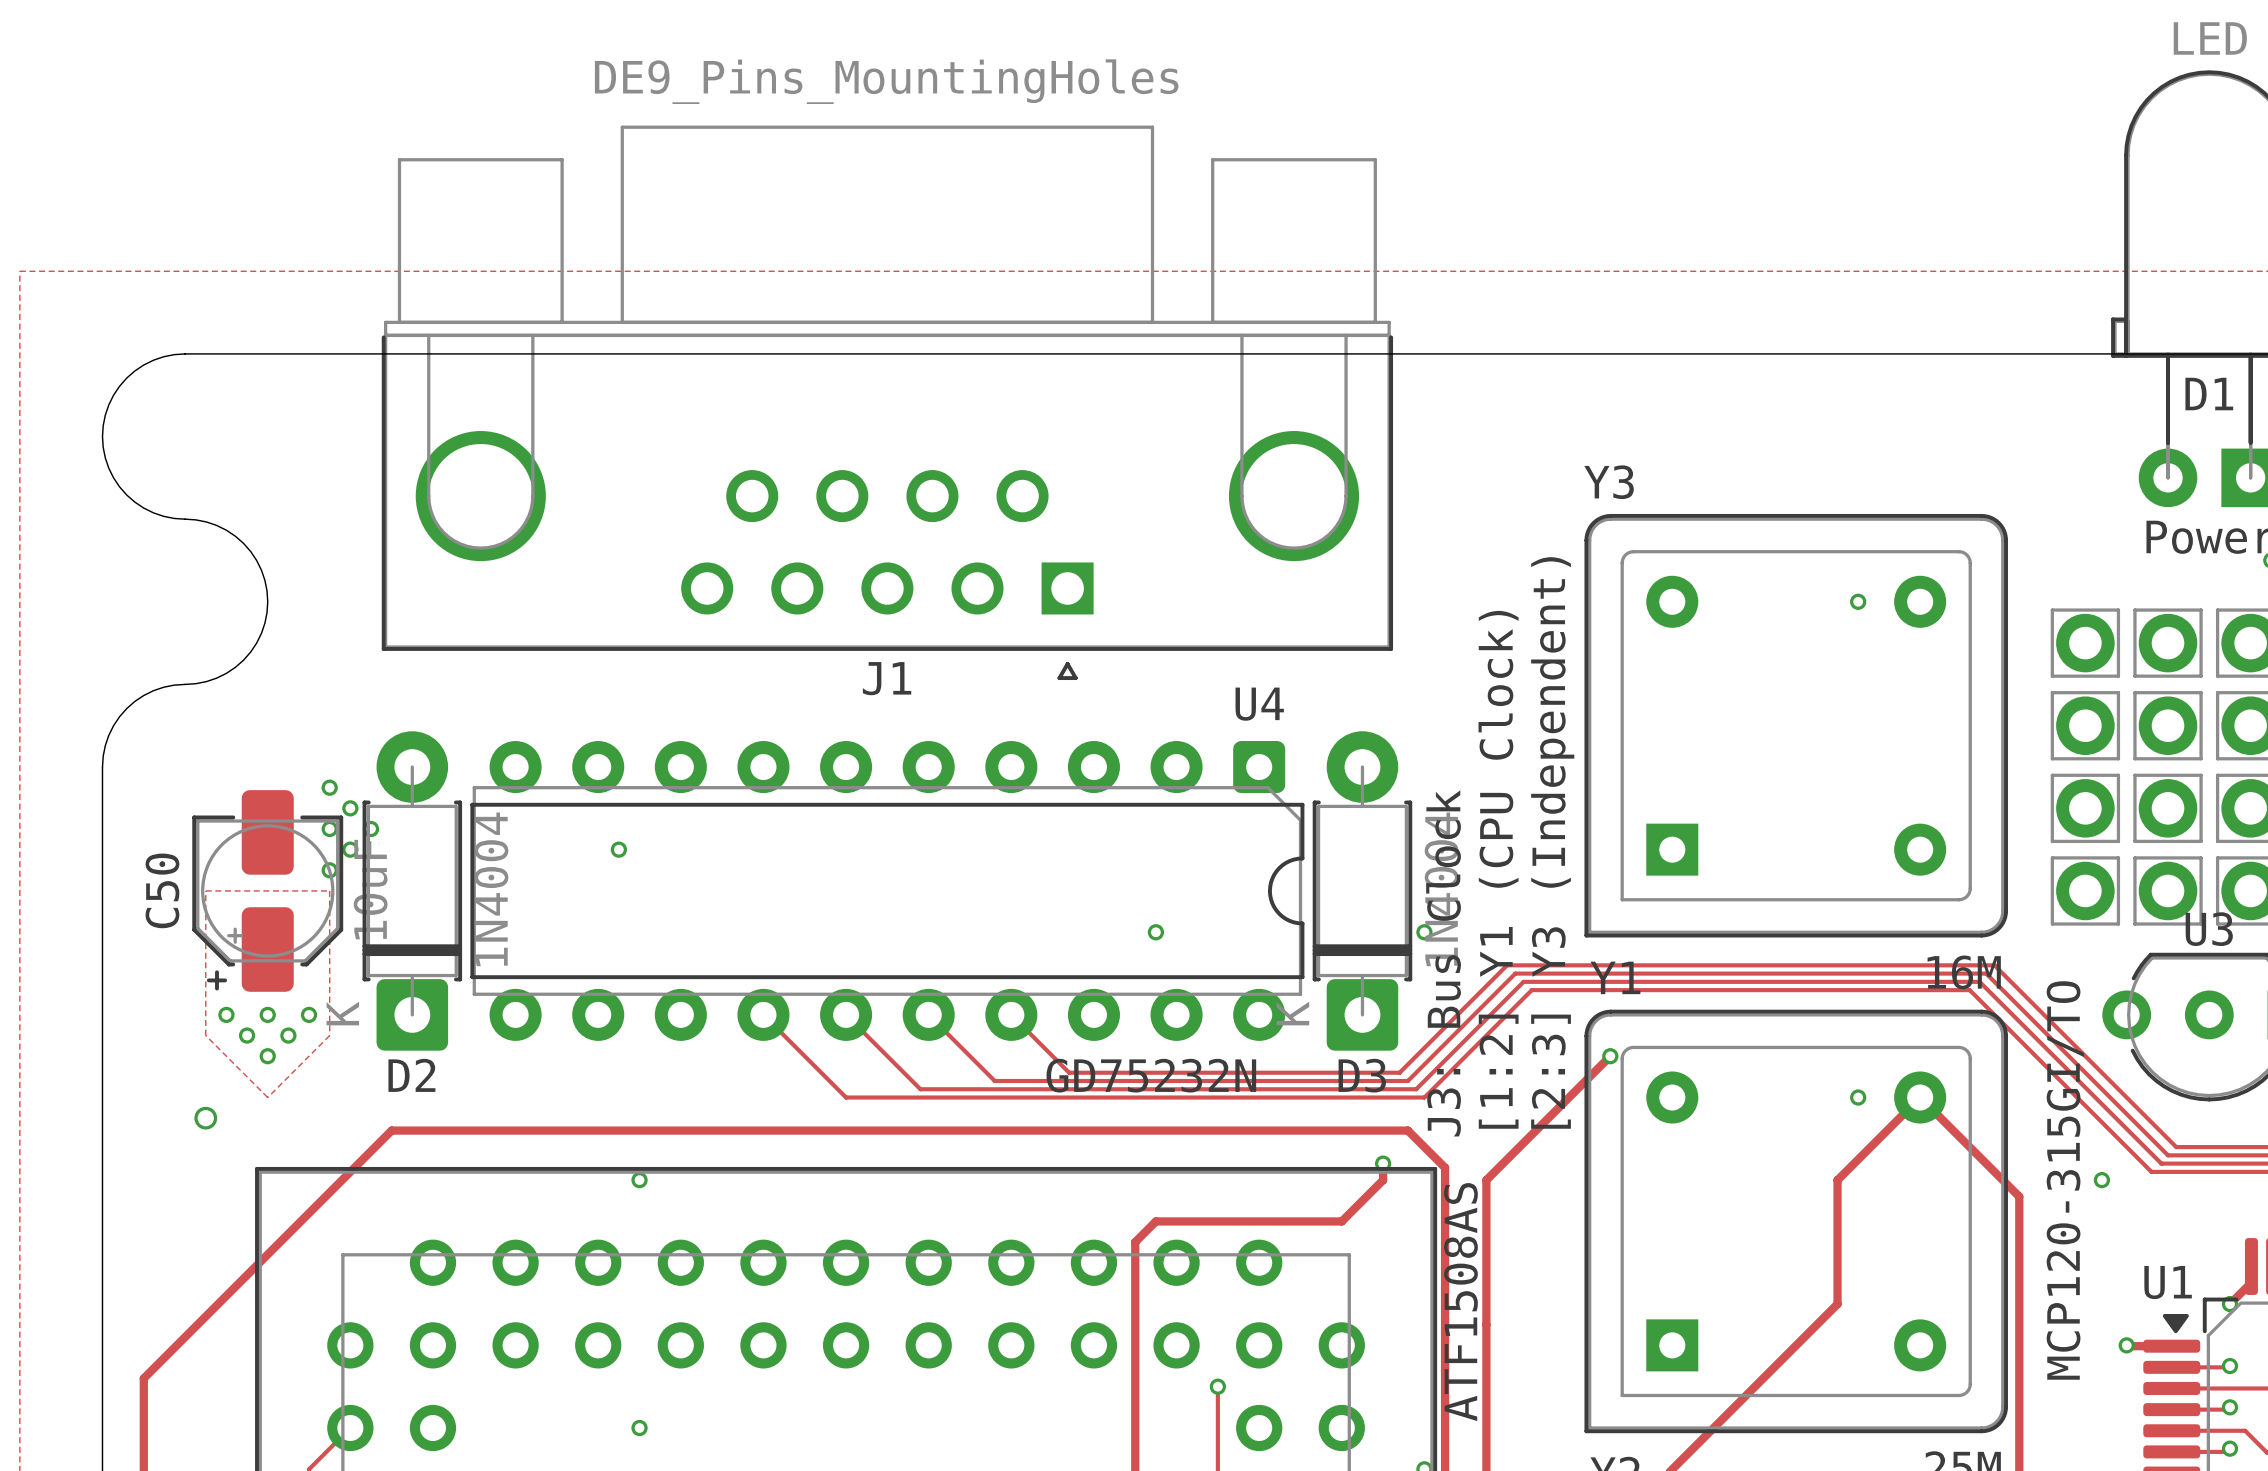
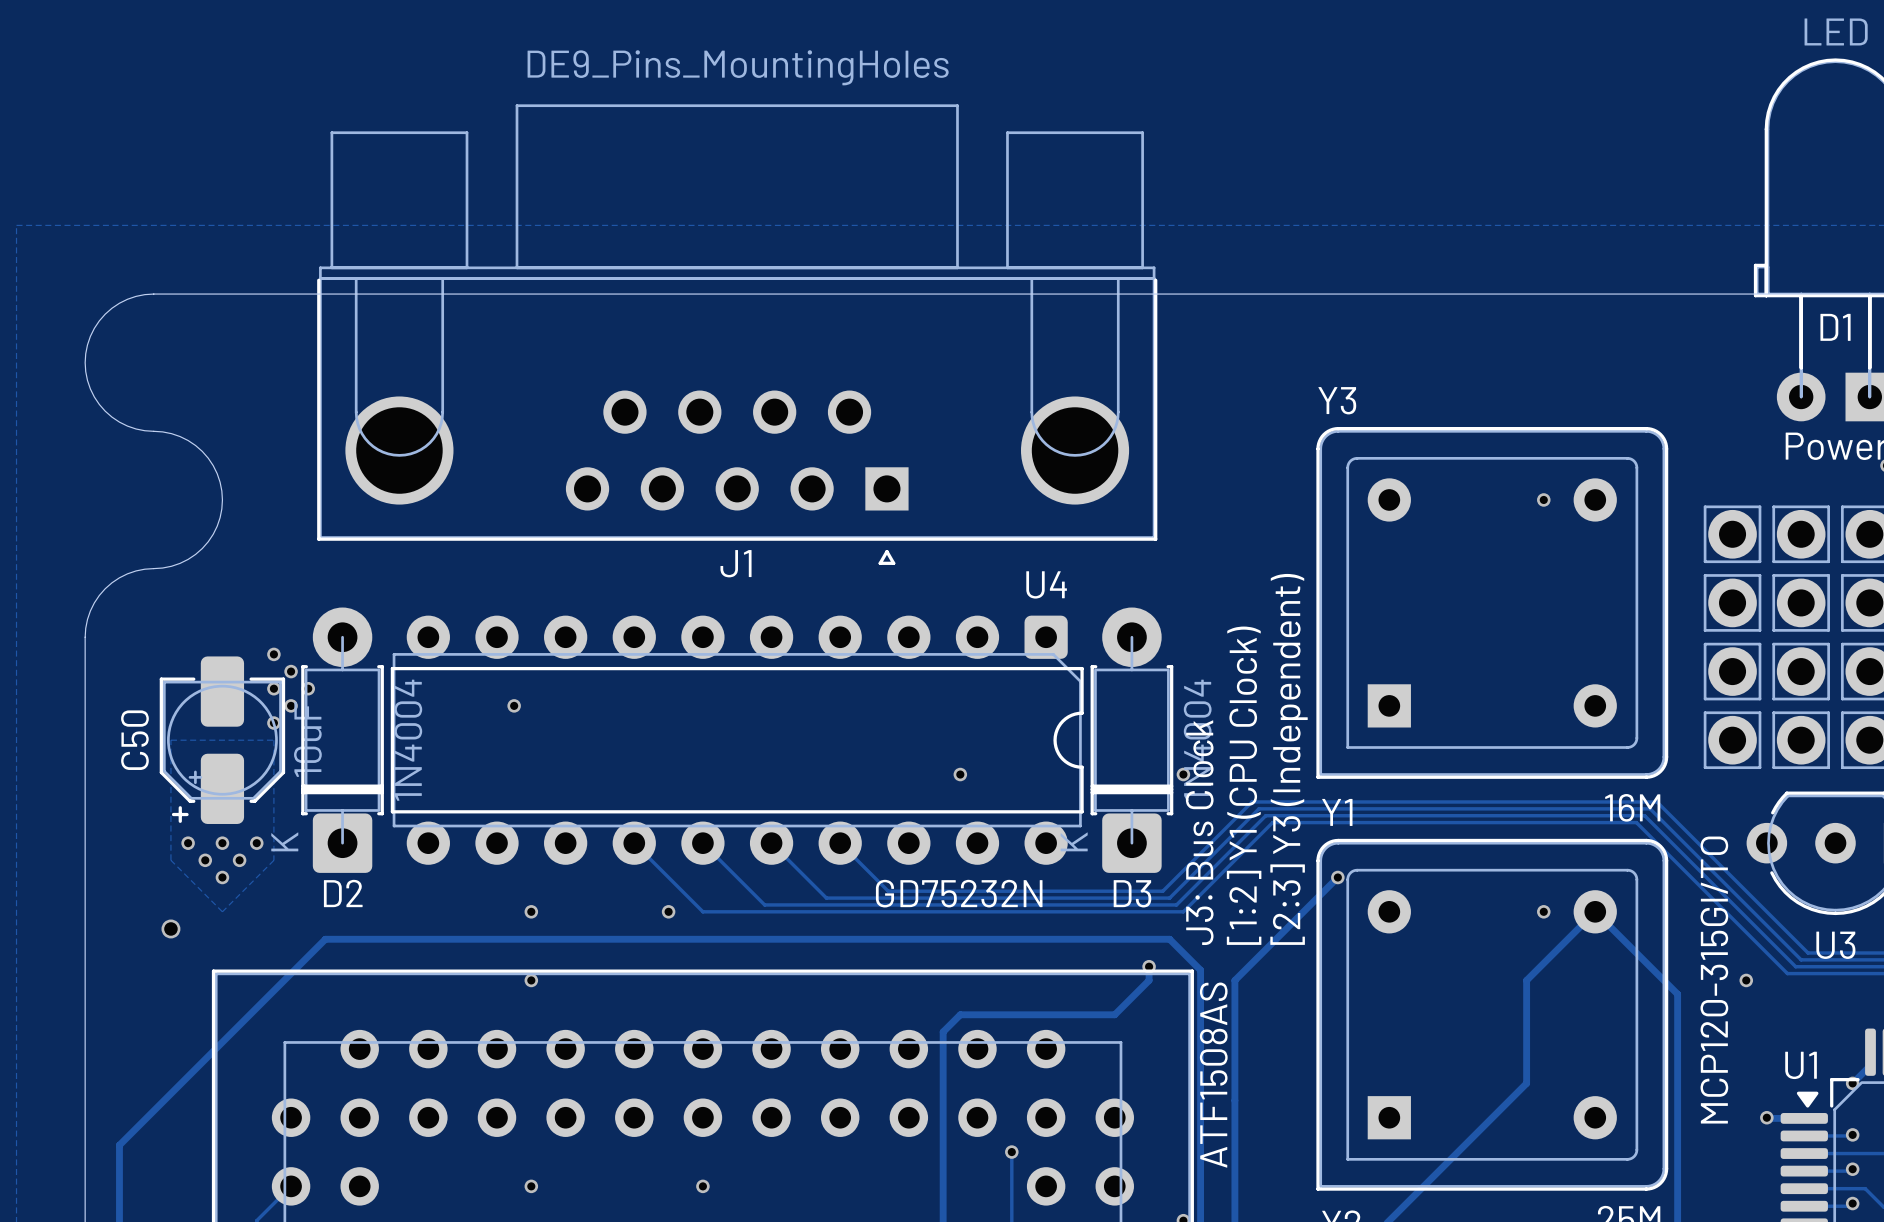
J1 footprint: [381, 125, 1394, 681] -> [317, 104, 1158, 565]
U3 name position: U3 (2209, 929) -> U3 (1835, 945)
via: none -> (531, 911)
via: none -> (668, 911)
via: none -> (702, 1186)

